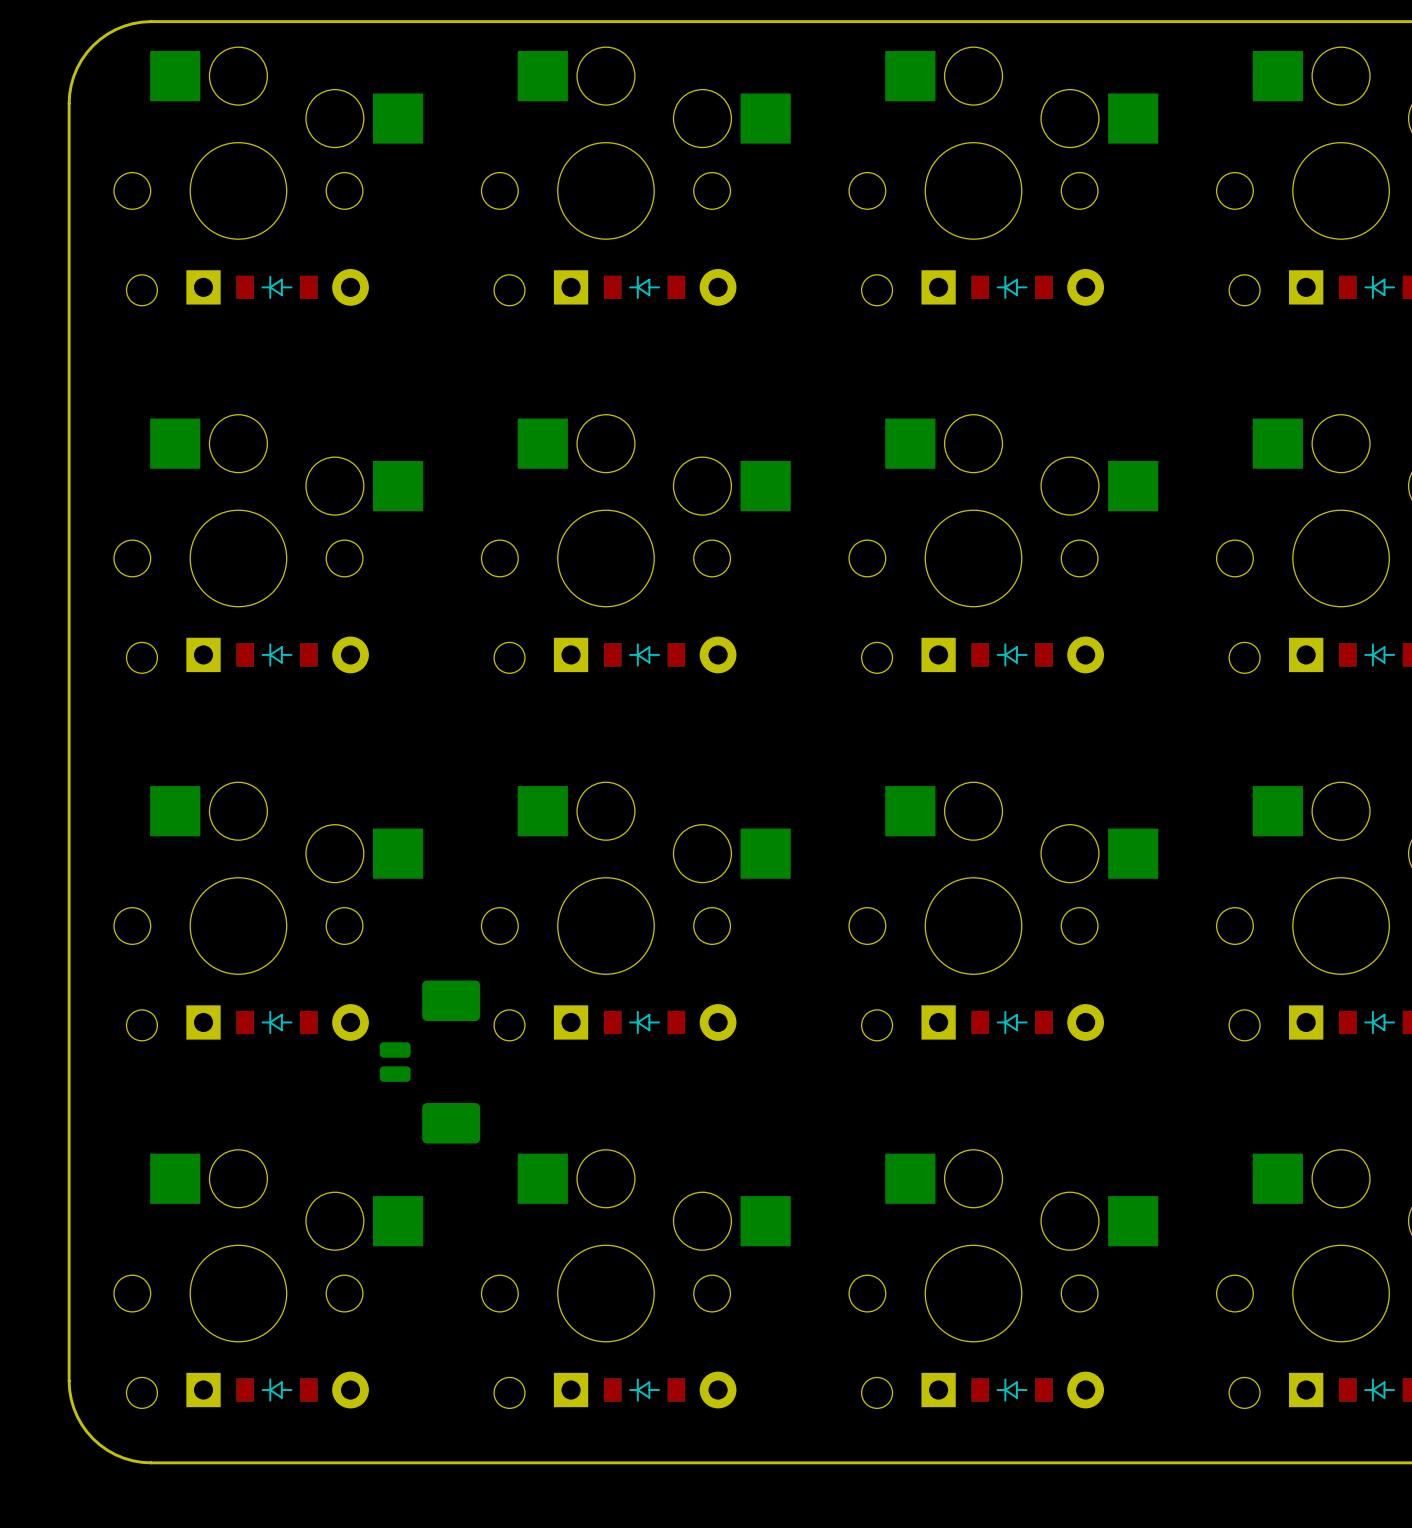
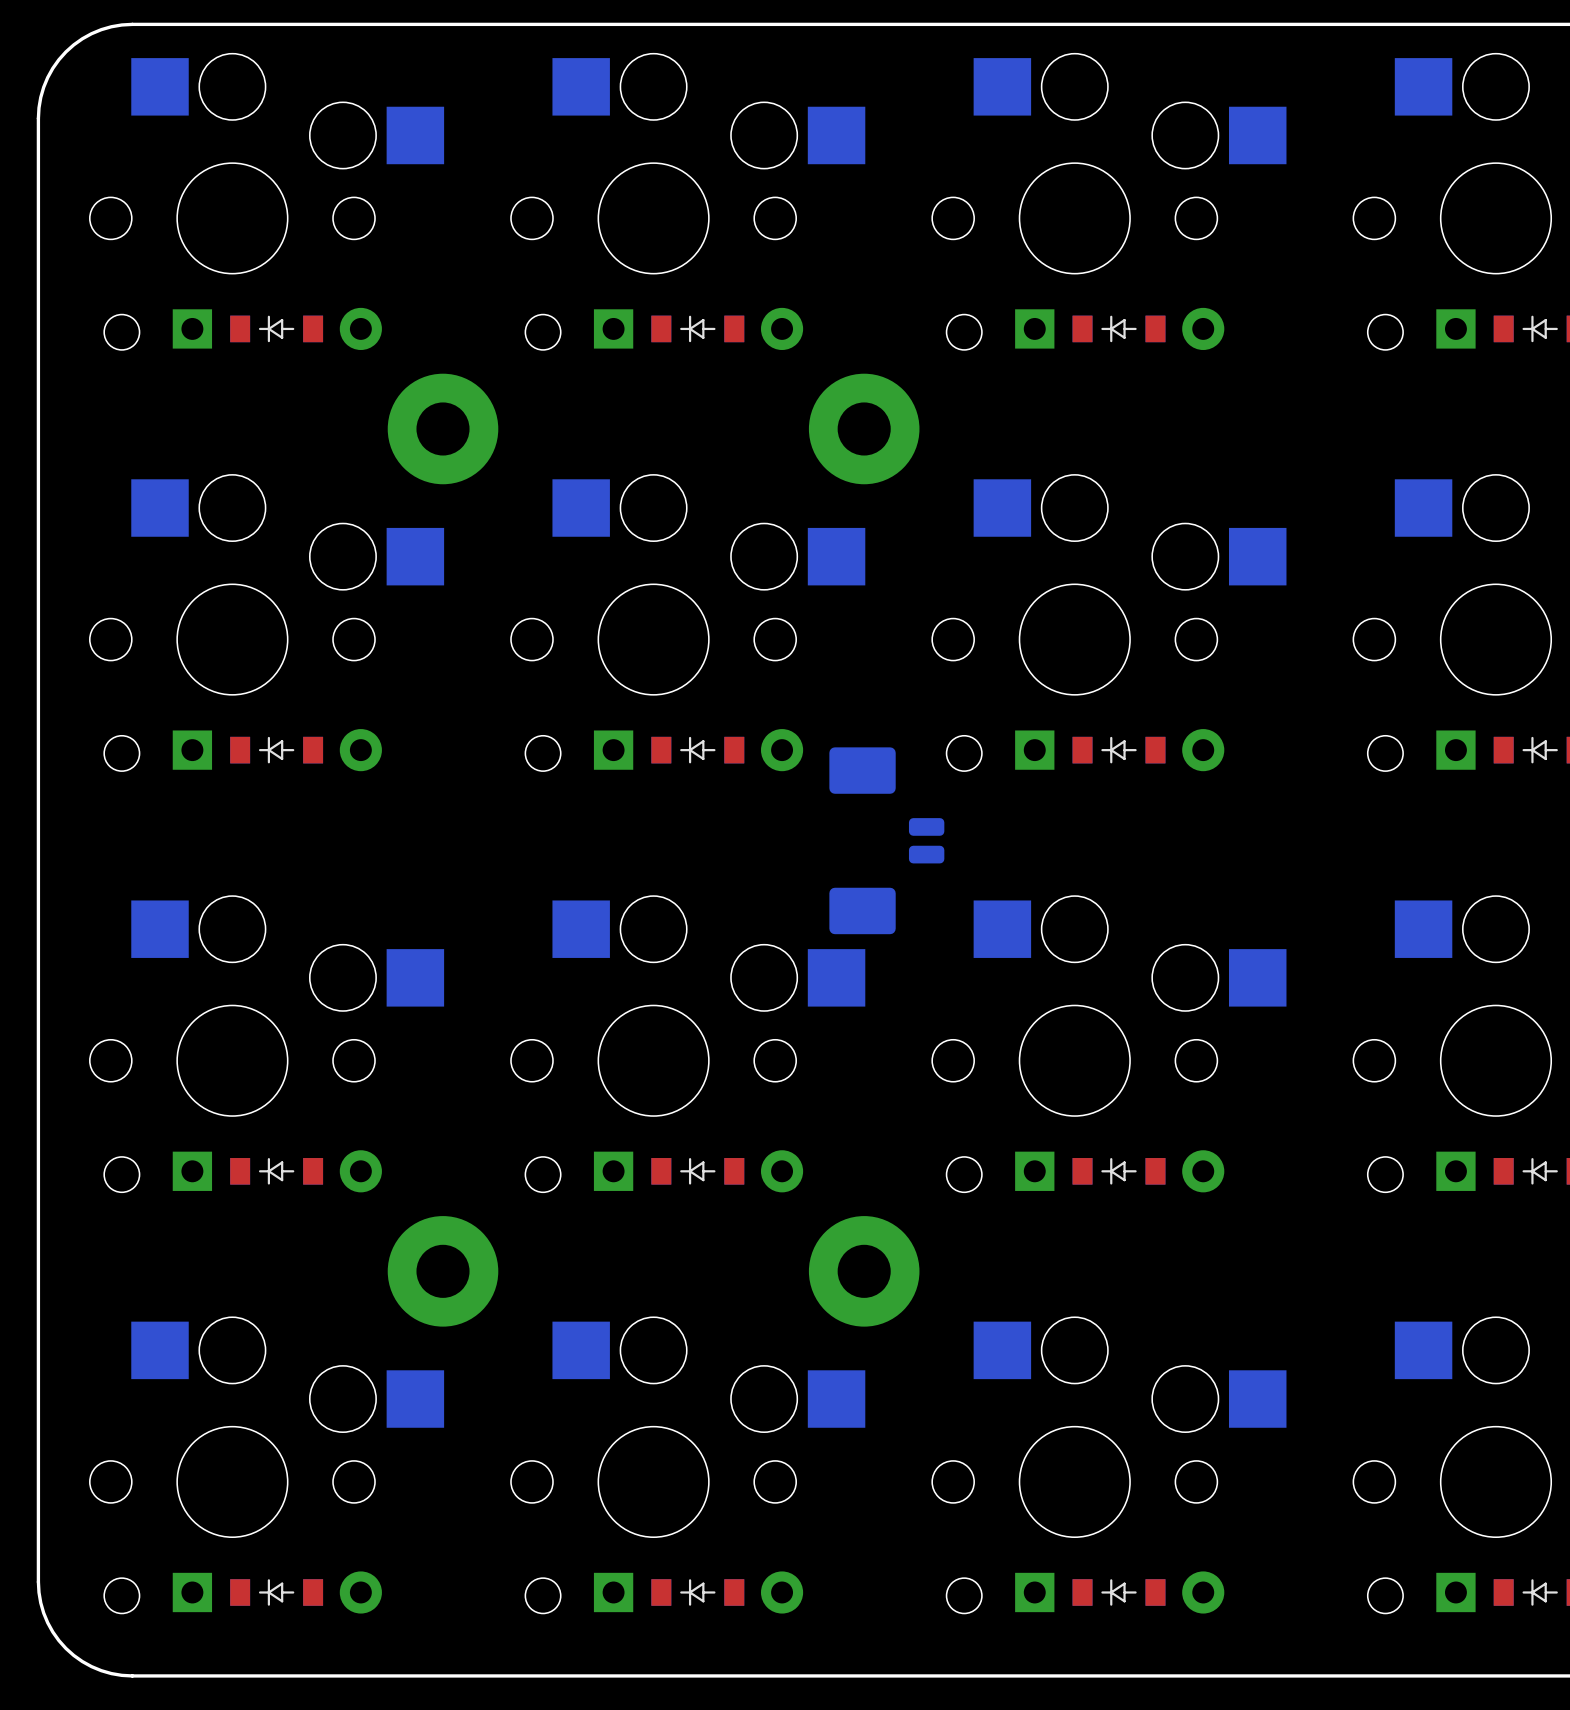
part: none -> (443, 428)
part: none -> (864, 428)
part: none -> (886, 840)
part: (429, 1062) -> none
part: none -> (443, 1271)
part: none -> (864, 1271)

